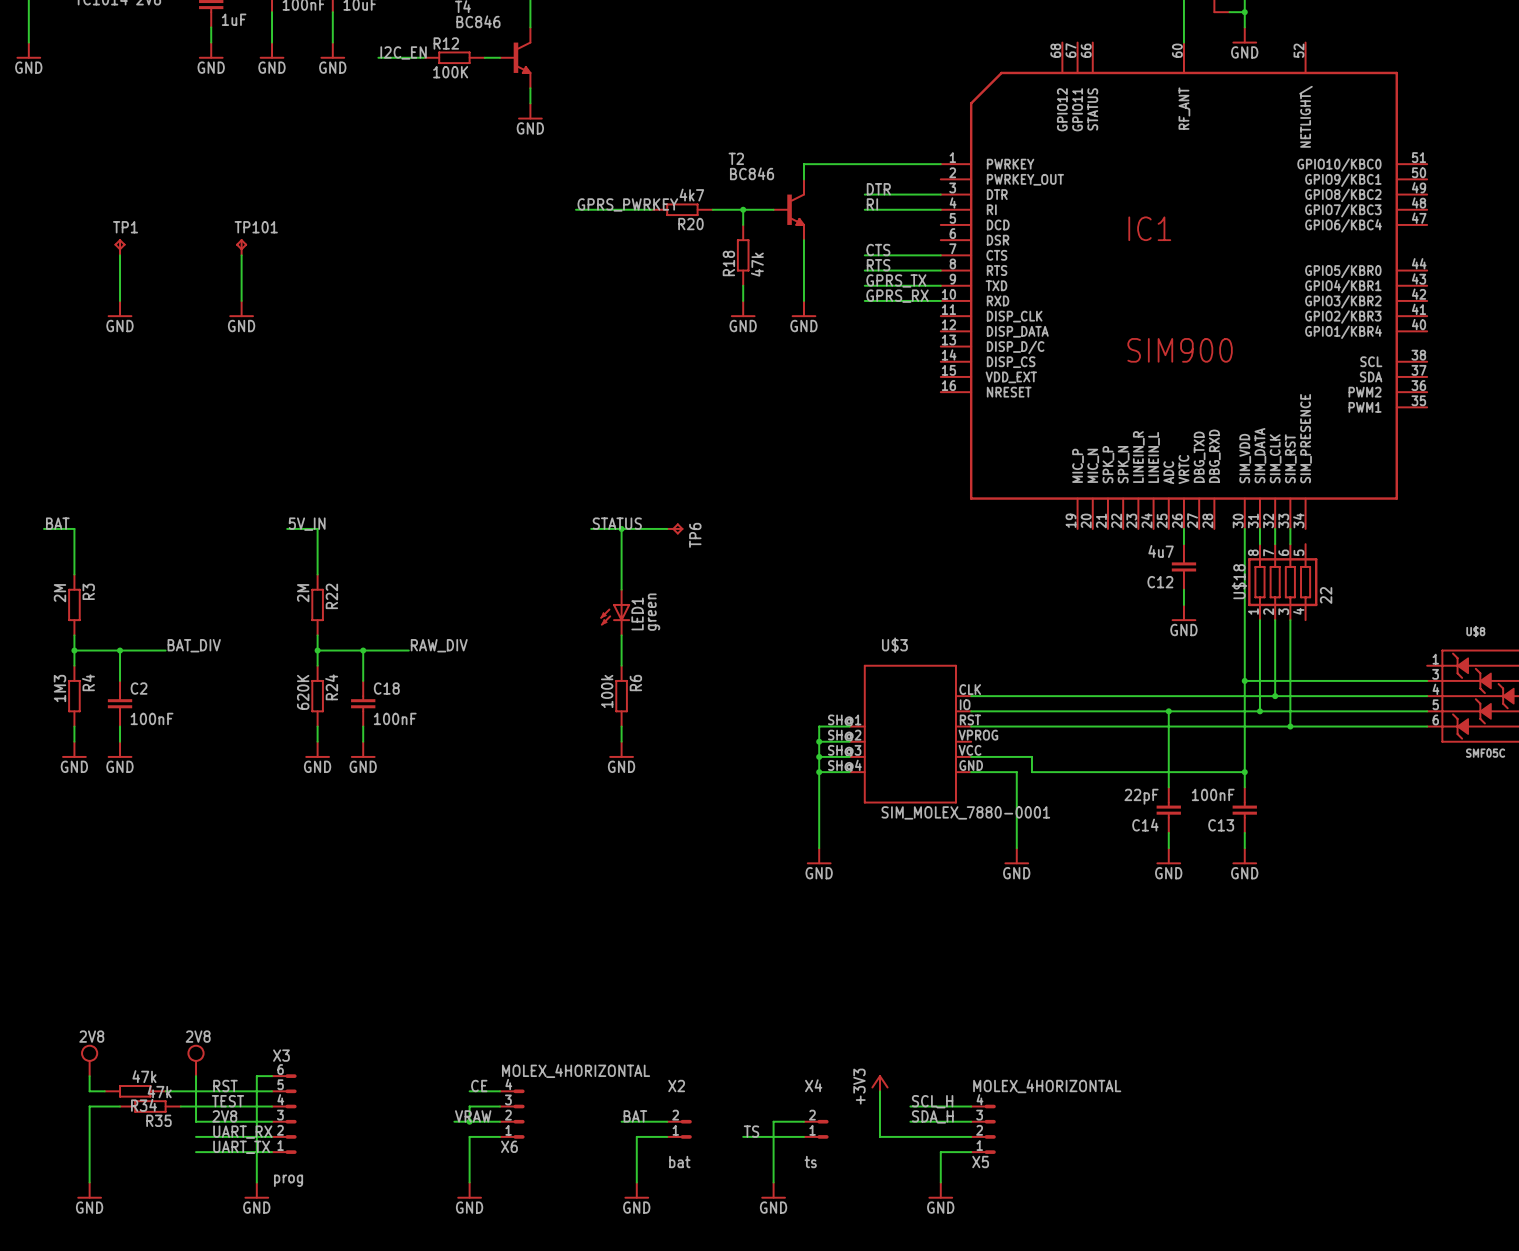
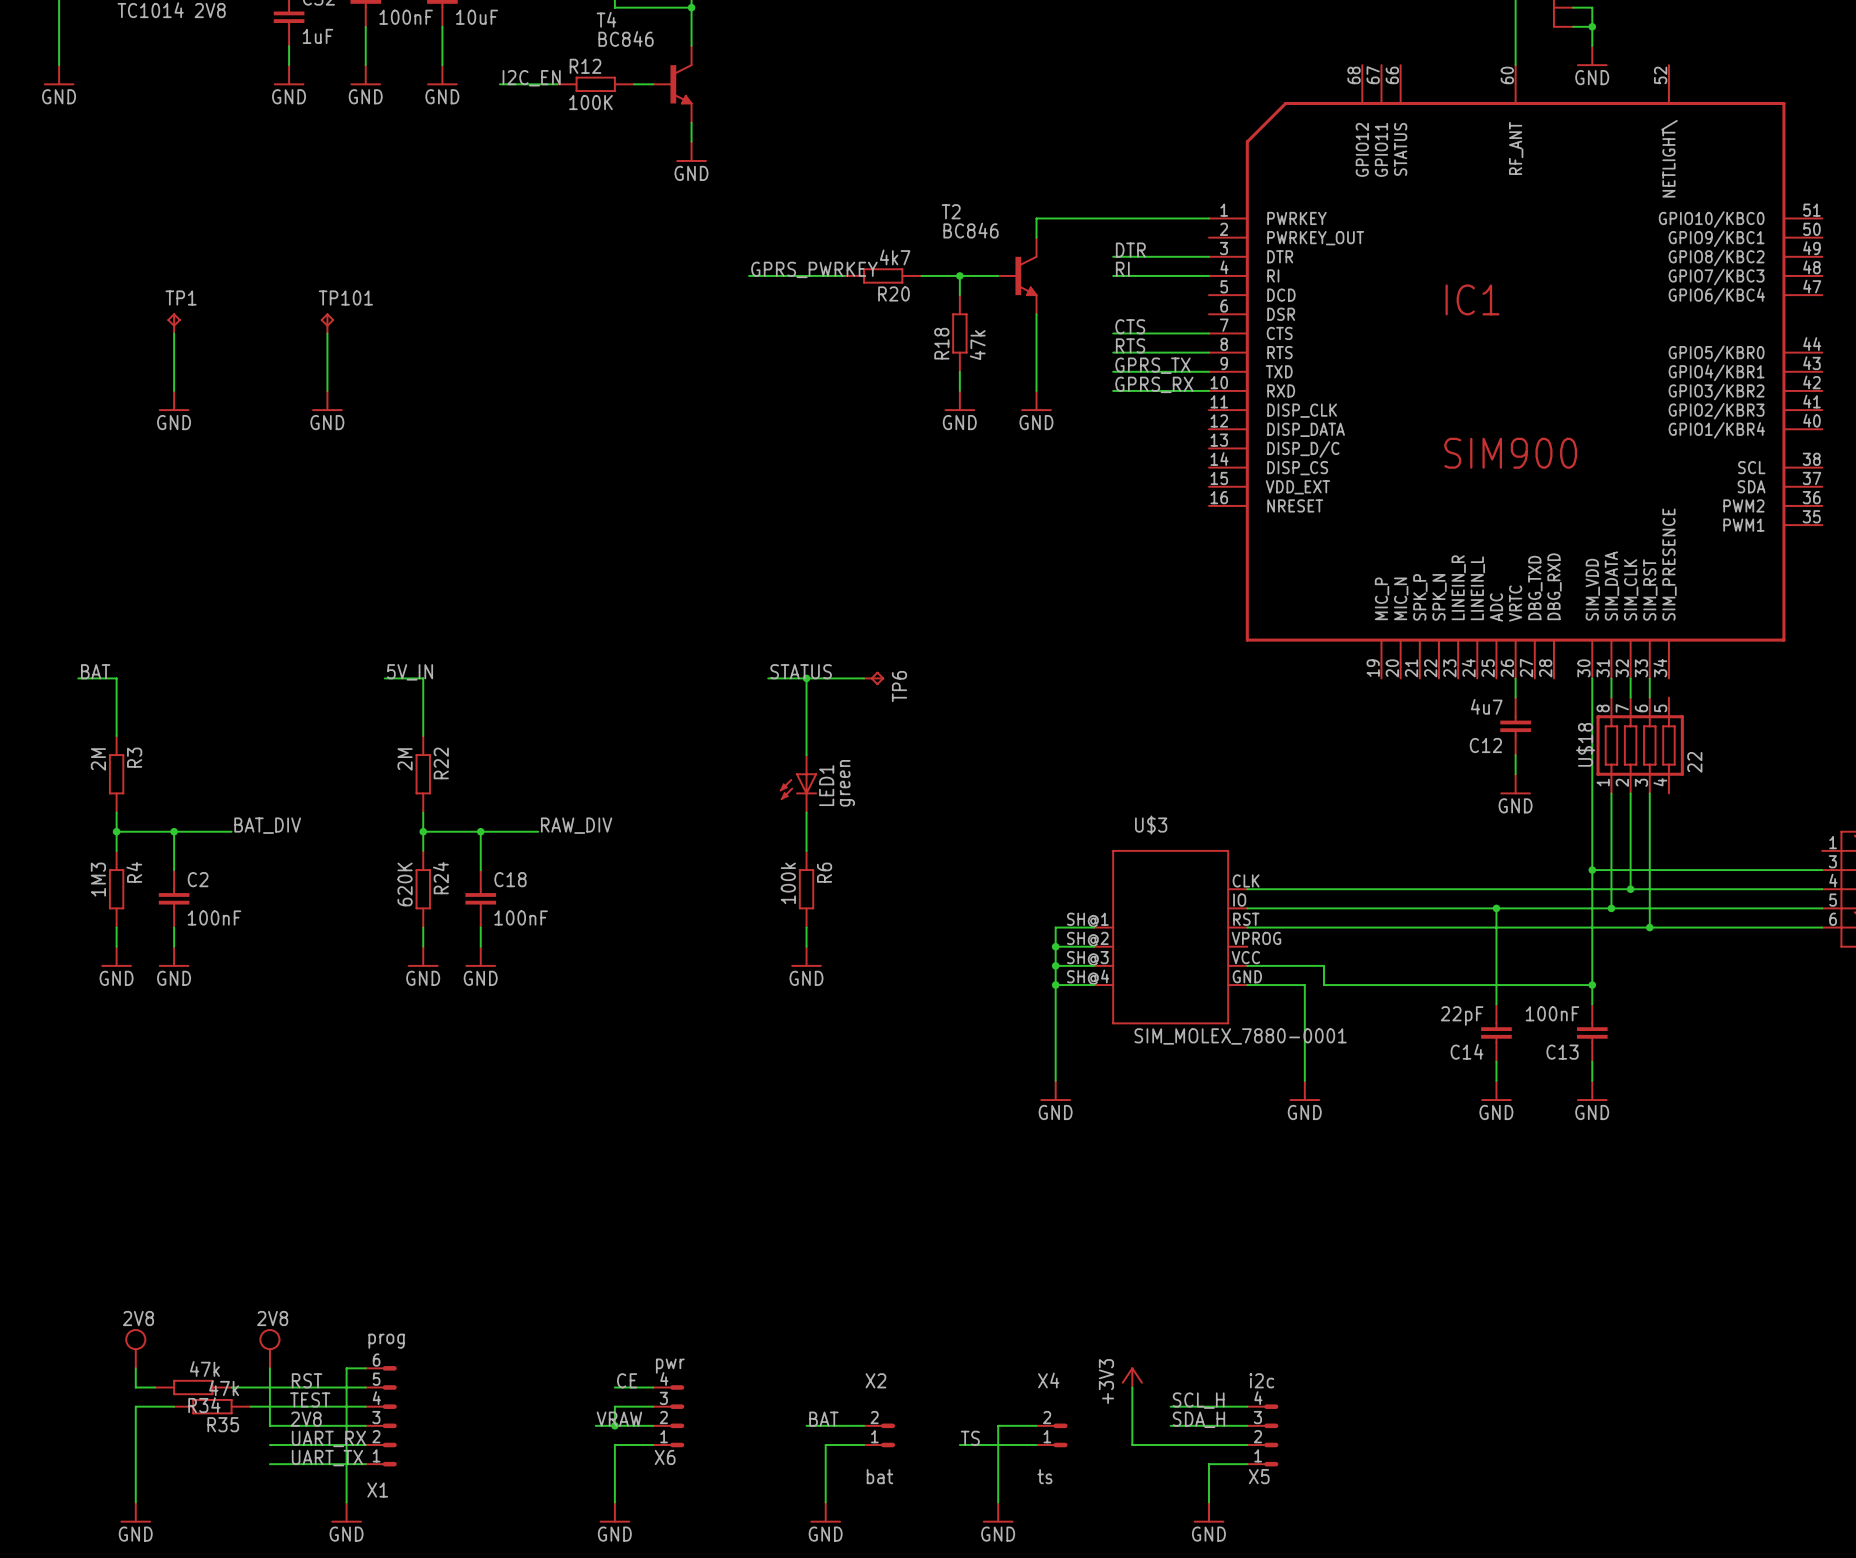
X3 name: X3 (281, 1055) -> X1 (377, 1490)
X6 value: MOLEX_4HORIZONTAL (576, 1071) -> pwr (670, 1366)
X5 value: MOLEX_4HORIZONTAL (1047, 1086) -> i2c (1261, 1380)
X3 value position: prog (288, 1180) -> prog (386, 1341)

